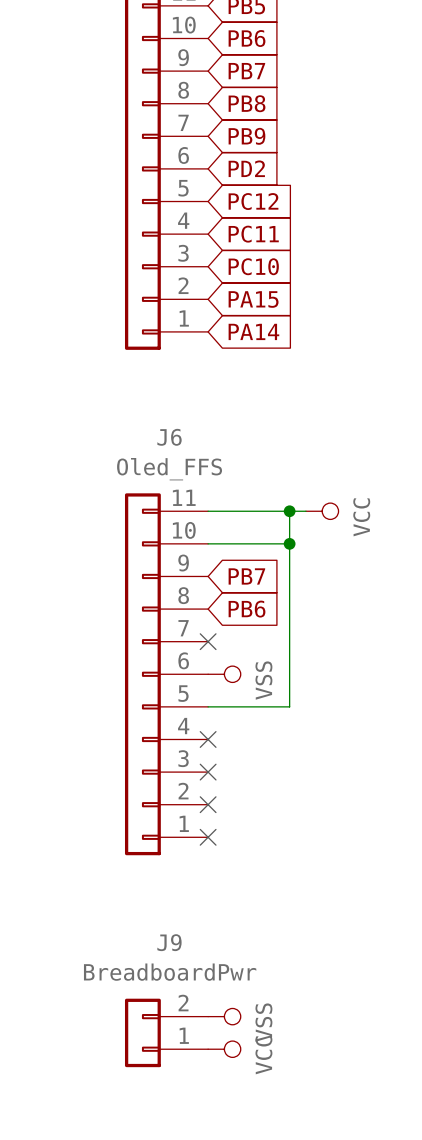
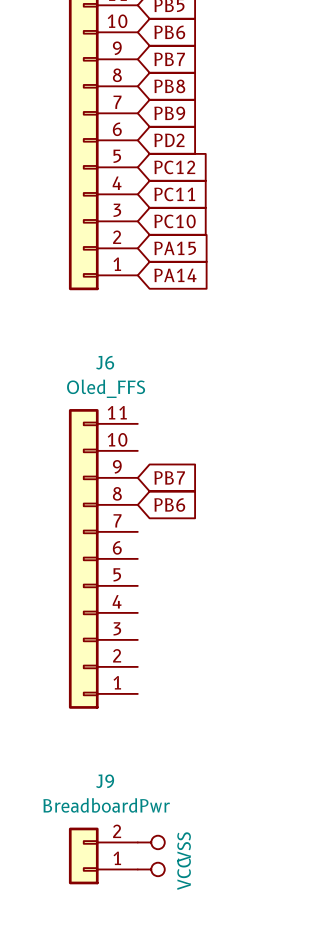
wire: (208, 511) (305, 511) -> none
wire: (289, 511) (289, 706) (208, 706) -> none
junction: (289, 511) -> none
power symbol: VCC (322, 511) -> none
wire: (208, 543) (289, 543) -> none
junction: (289, 543) -> none
no-connect mark: (208, 641) -> none
power symbol: VSS (224, 674) -> none
no-connect mark: (208, 739) -> none
no-connect mark: (208, 772) -> none
no-connect mark: (208, 804) -> none
no-connect mark: (208, 837) -> none

